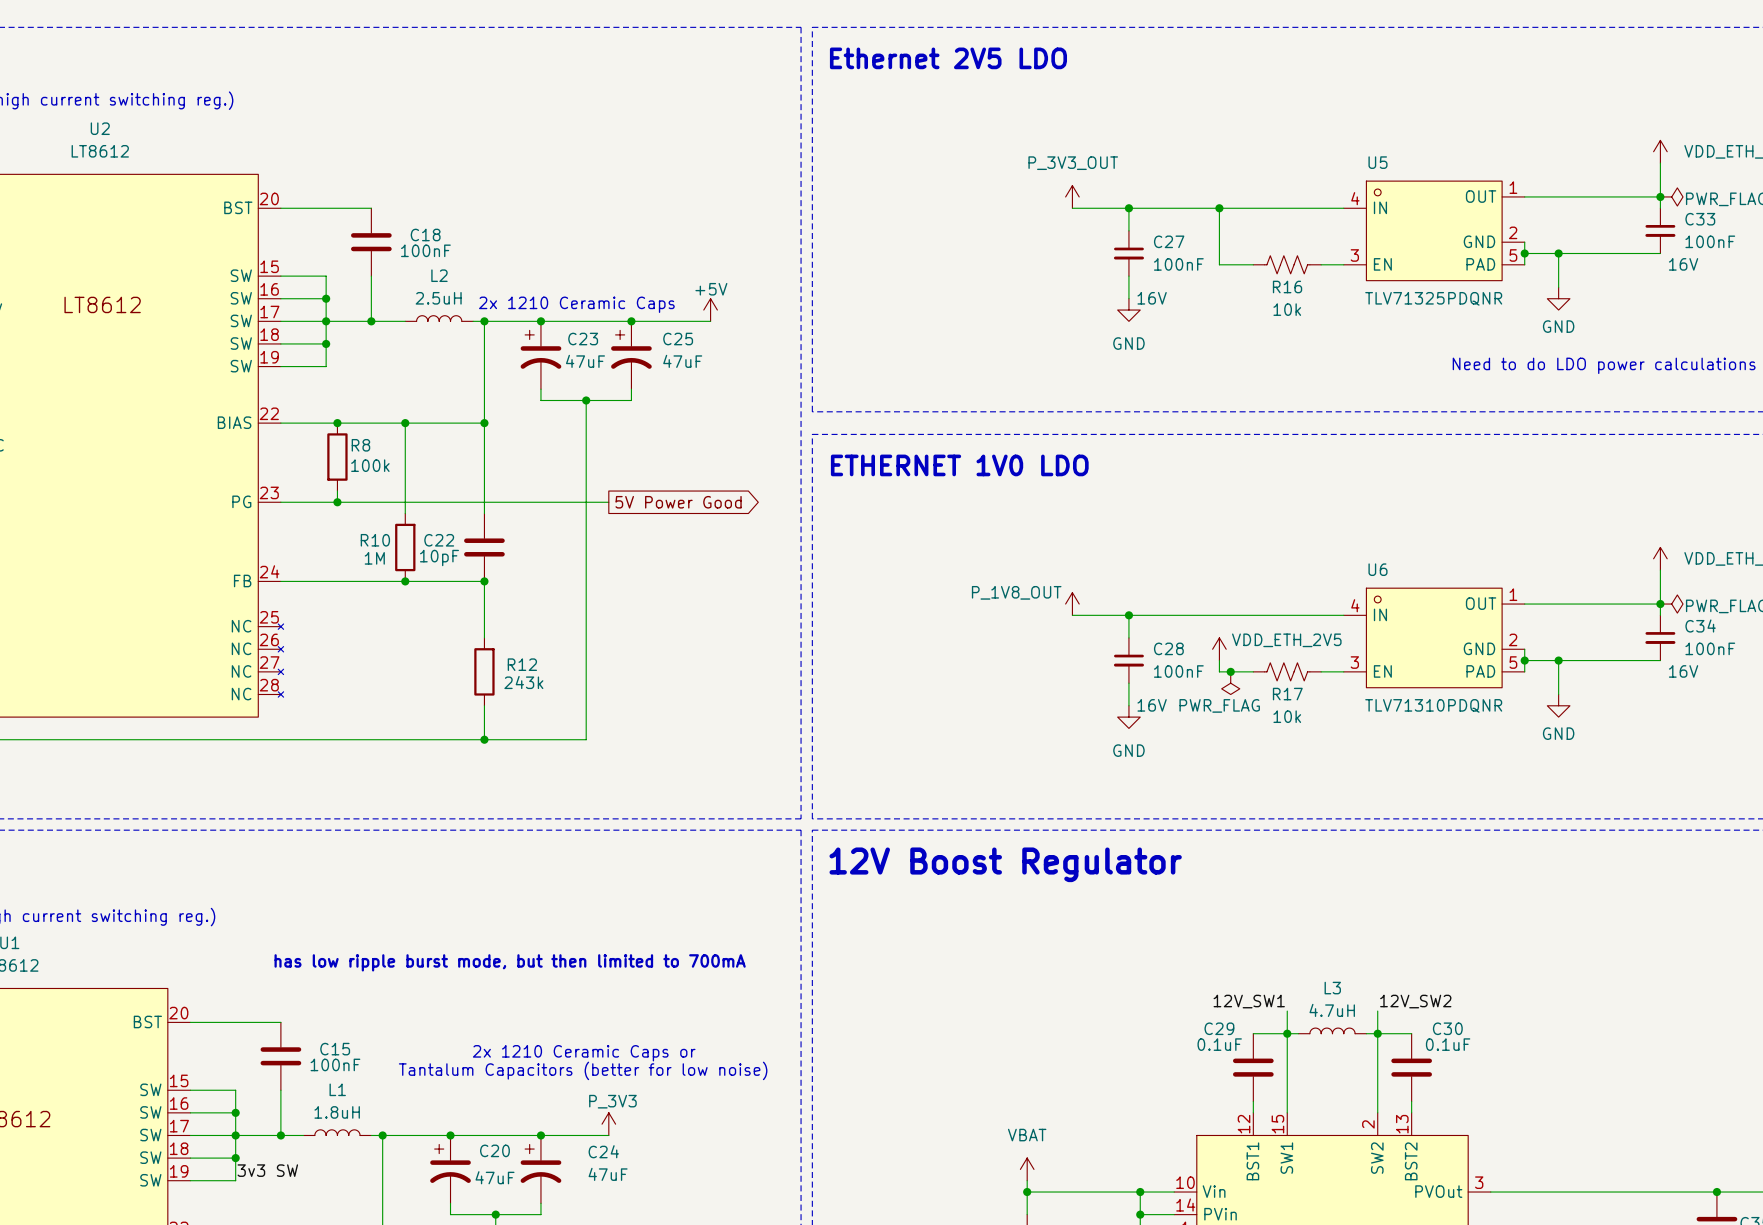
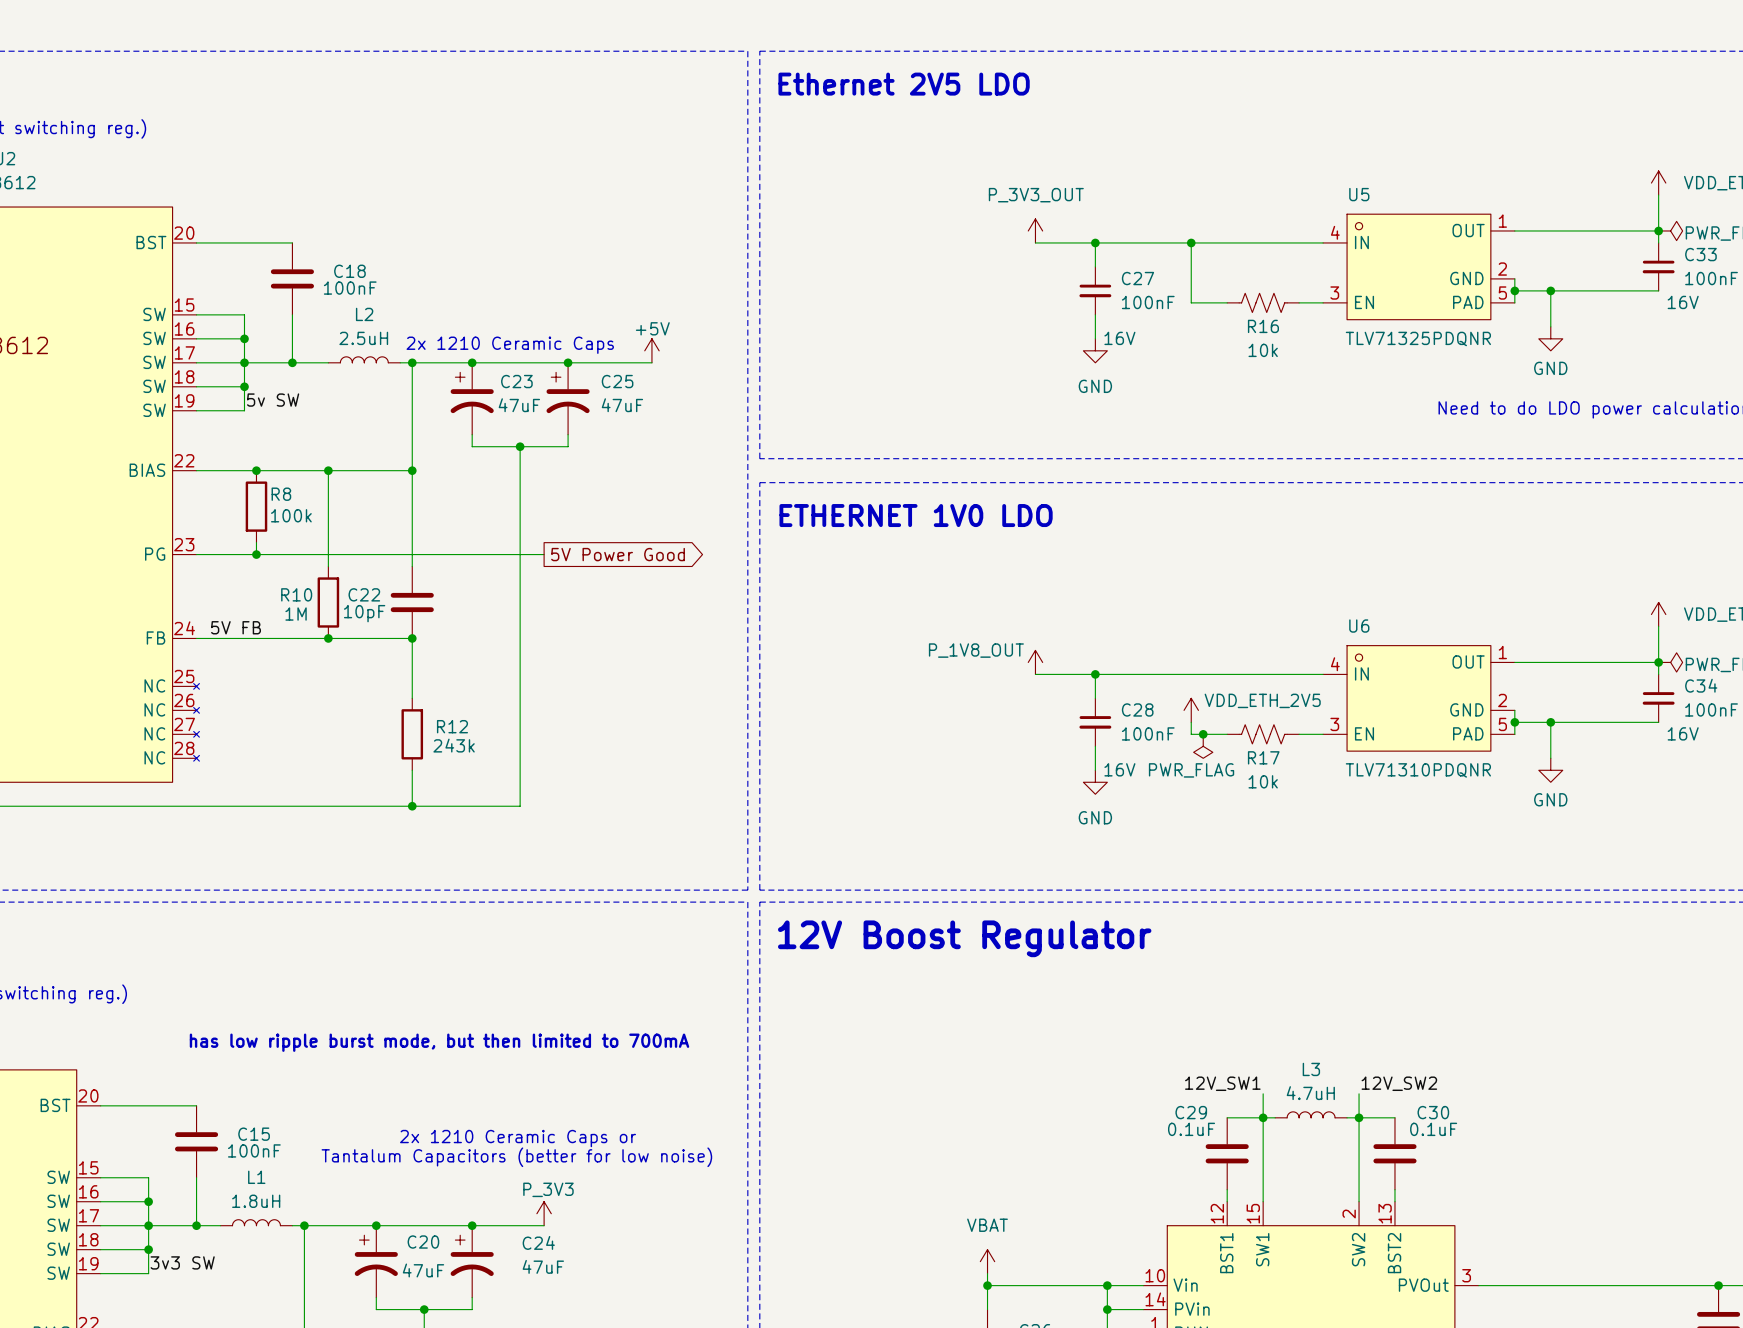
label: none -> 5v SW (273, 400)
label: none -> 5V FB (236, 627)

